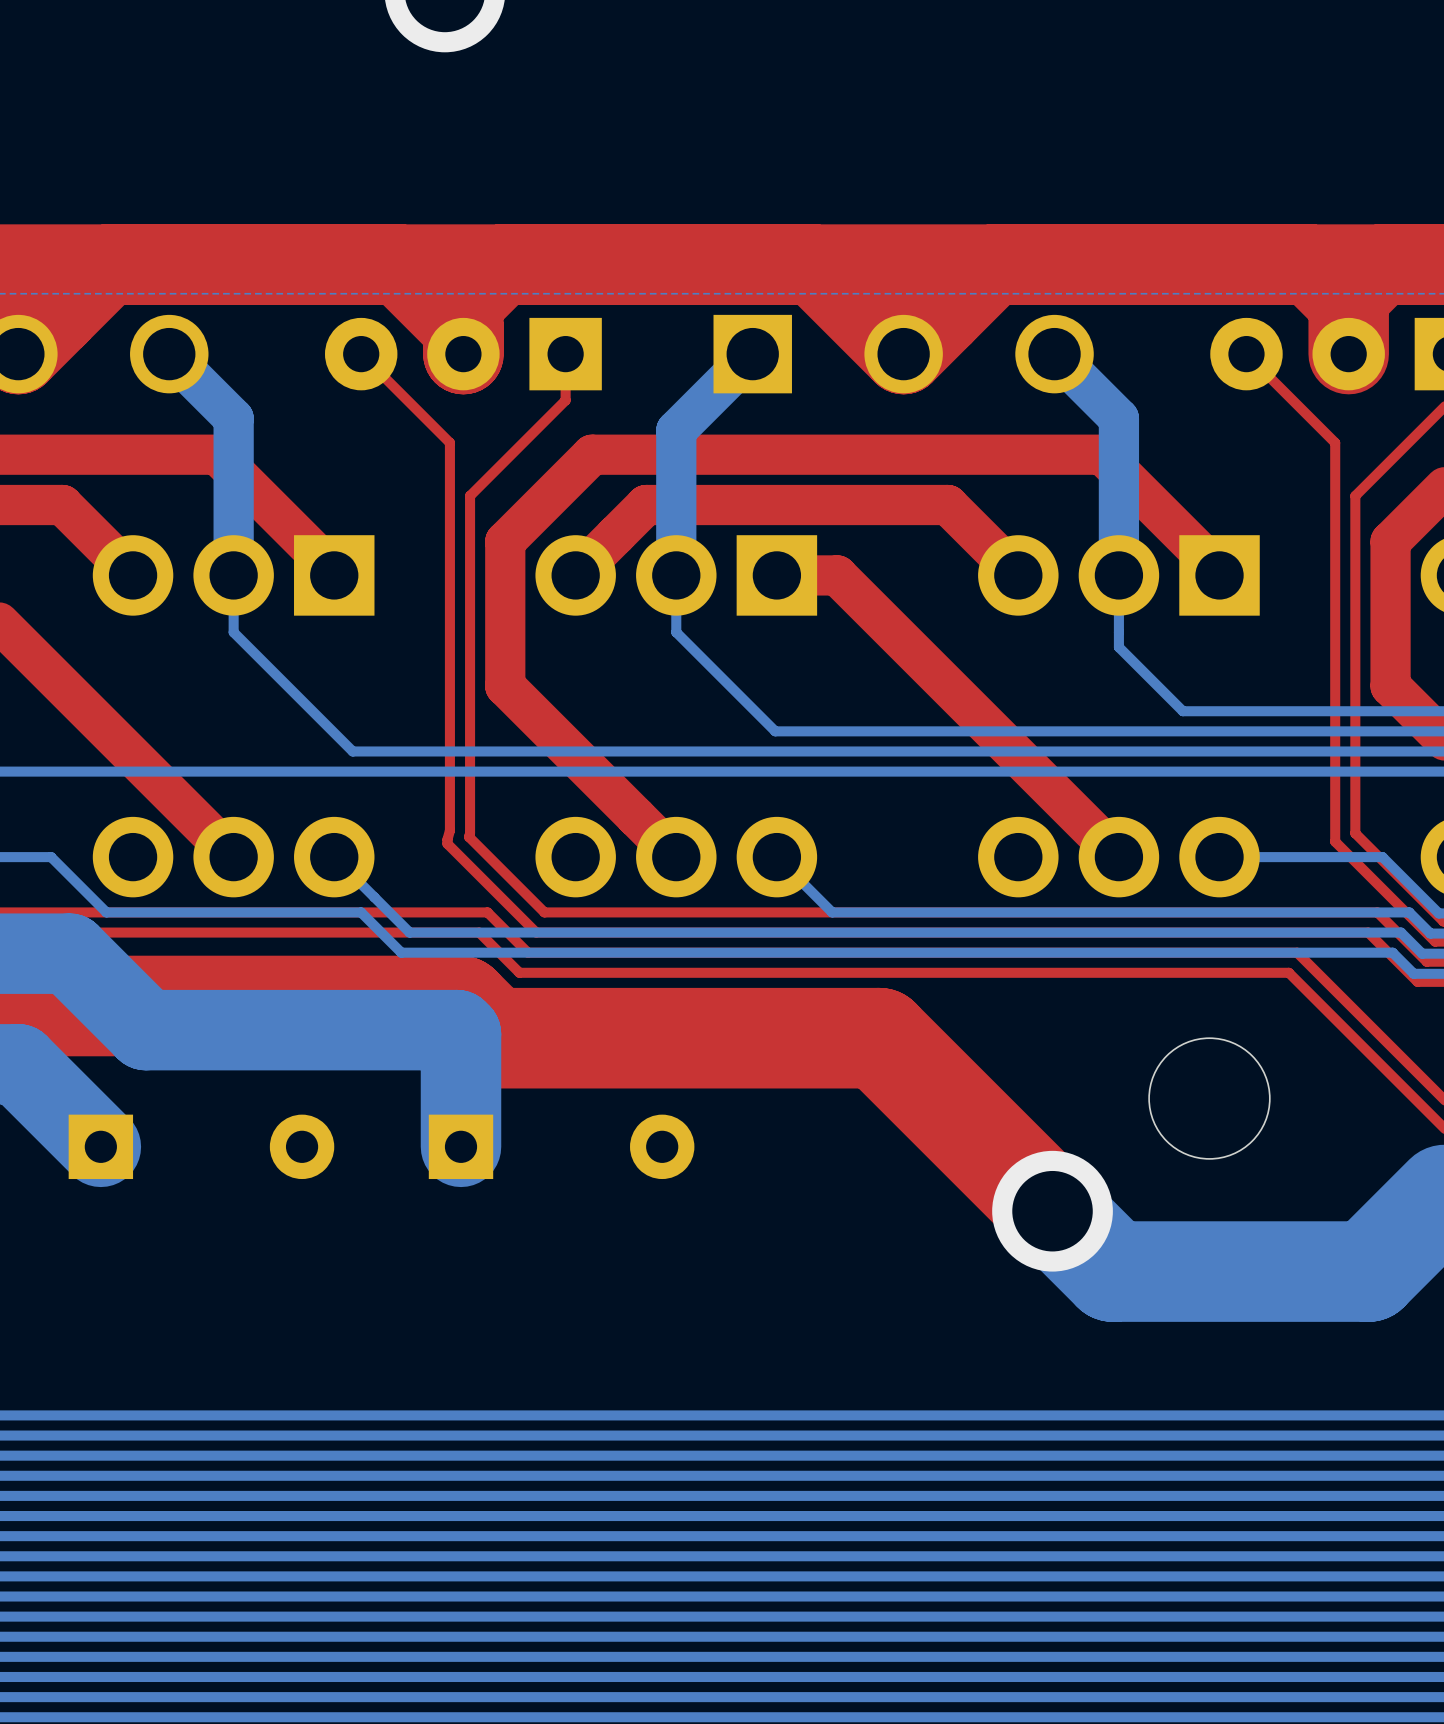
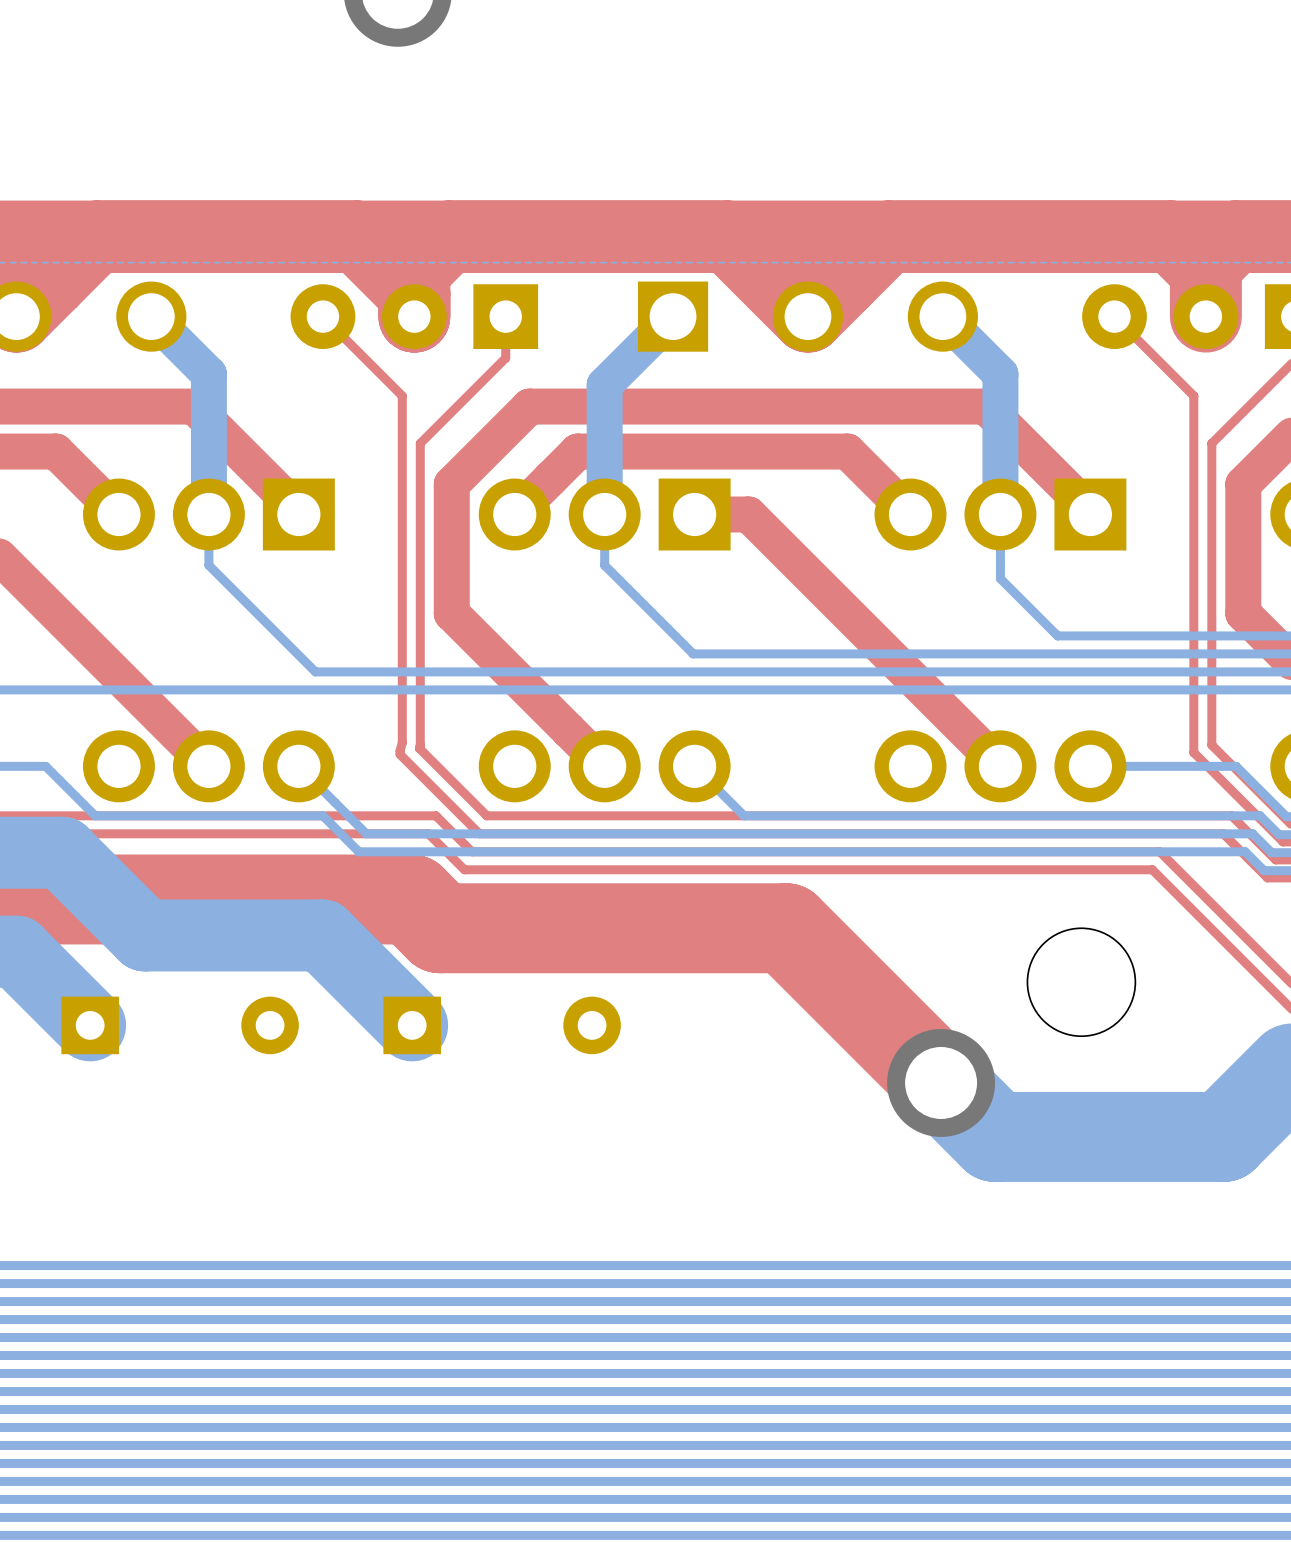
bottom track: (145, 1030) (456, 1030) (461, 1034) (461, 1146) -> (130, 921) (144, 935) (322, 935) (412, 1025)

